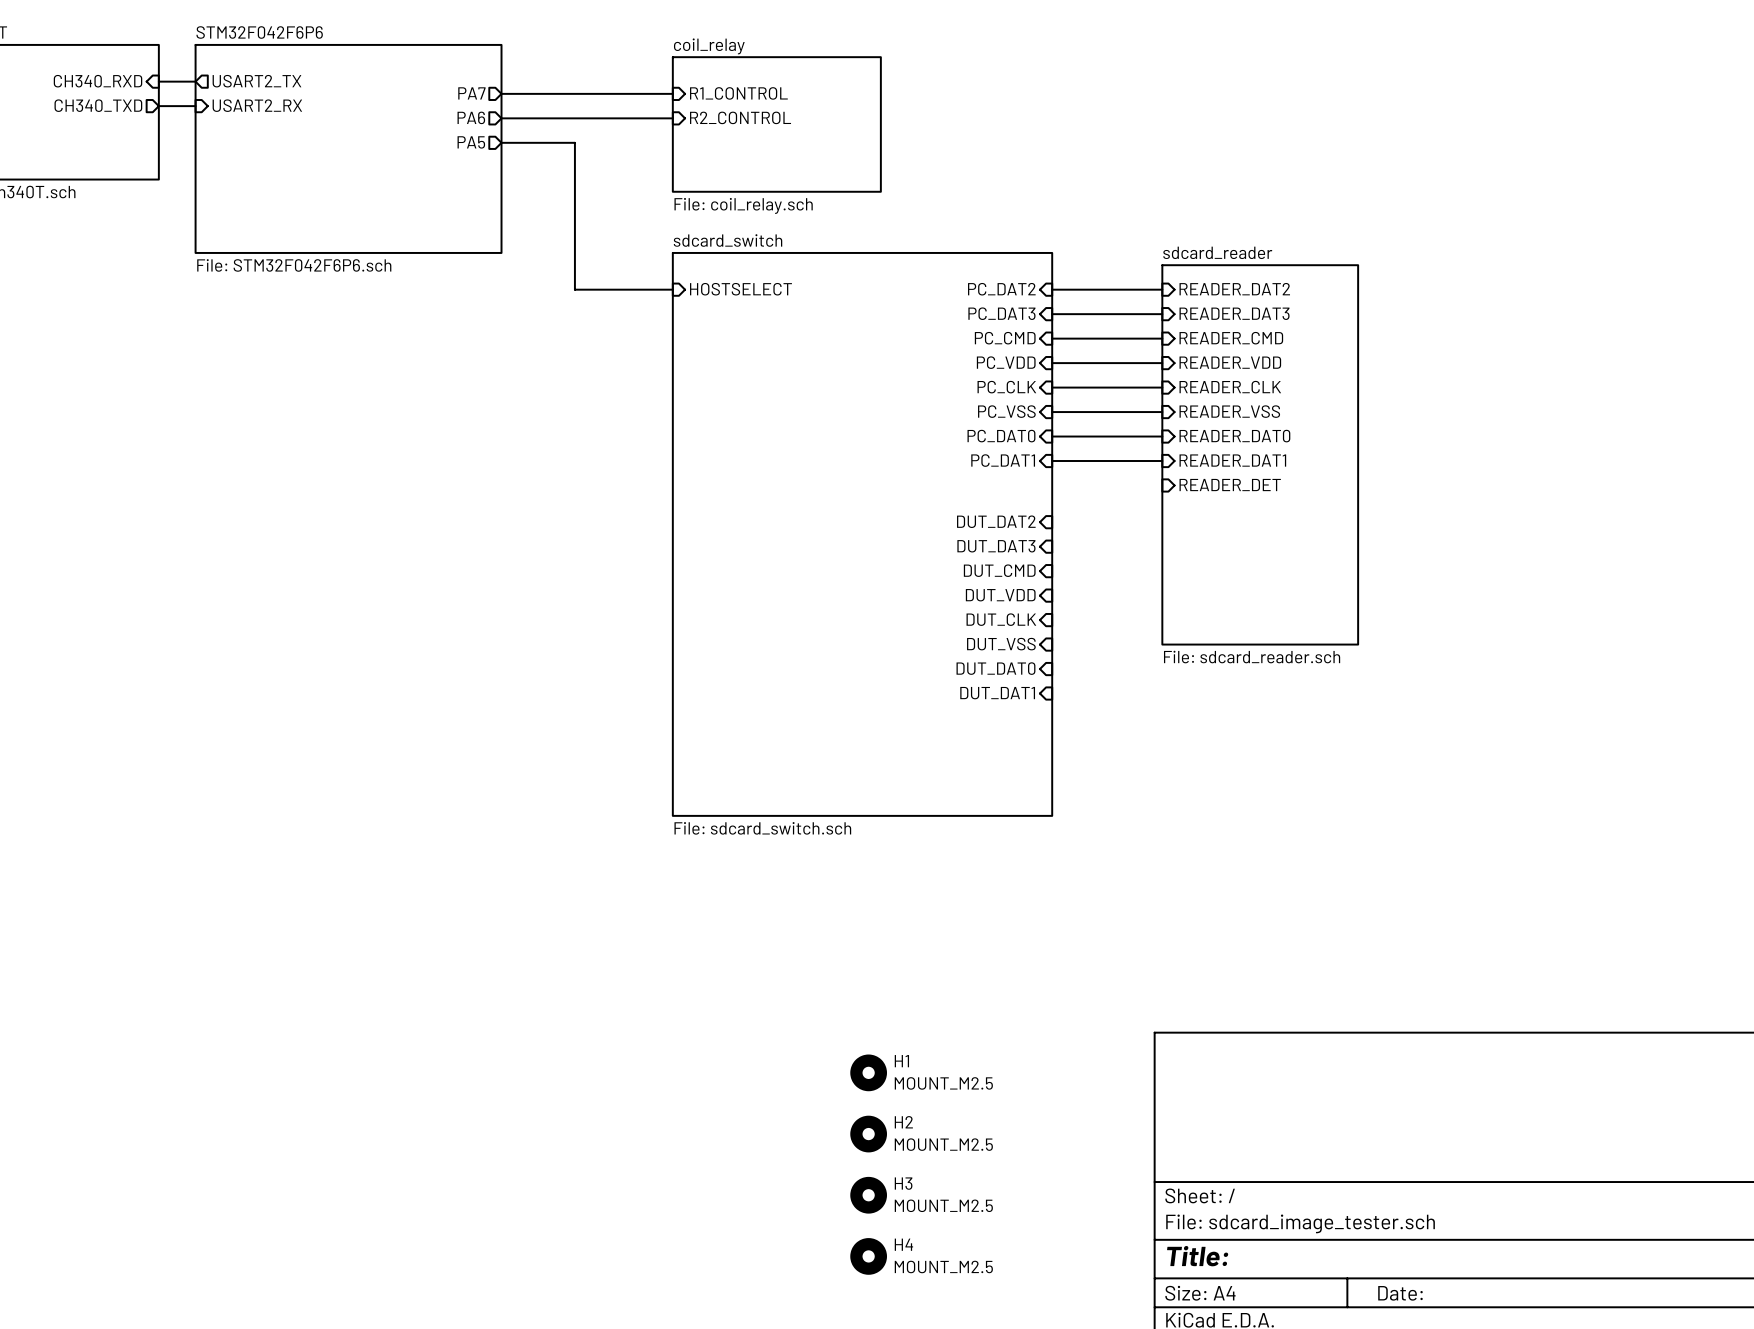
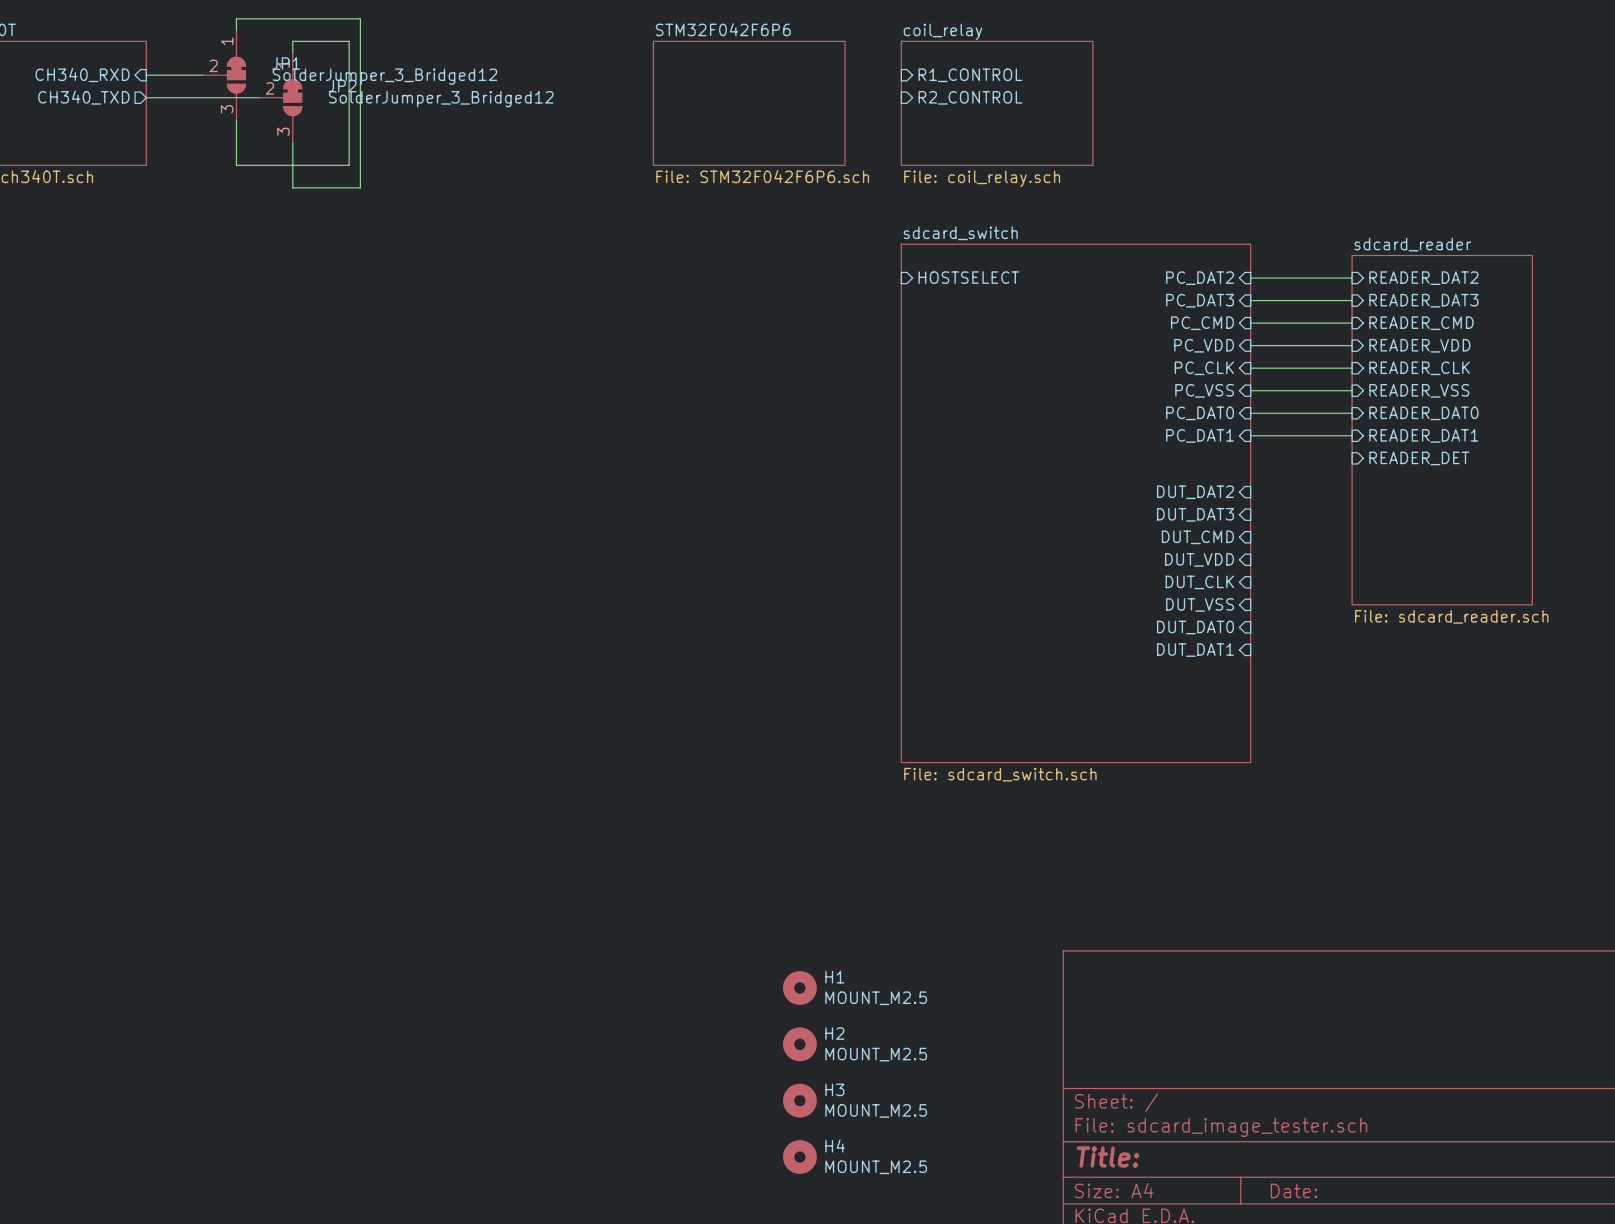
wire: none -> (236, 30) (236, 18) (360, 18) (360, 187) (292, 187) (292, 142)
sheet STM32F042F6P6 name position: STM32F042F6P6 (259, 32) -> STM32F042F6P6 (723, 29)
sheet STM32F042F6P6 shape: [195, 44, 502, 253] -> [653, 41, 845, 166]
wire: none -> (292, 52) (292, 41) (349, 41) (349, 165) (236, 165) (236, 120)
wire: none -> (180, 75) (202, 75)
JP1: none -> SolderJumper_3_Bridged12 (224, 75)
sheet pin: USART2_TX (256, 81) -> none
sheet pin: none -> R1_CONTROL (970, 75)
sheet pin: PA7 (471, 93) -> none
wire: (501, 93) (672, 93) -> none
sheet pin: R1_CONTROL (738, 93) -> none
sheet pin: USART2_RX (257, 105) -> none
sheet pin: none -> R2_CONTROL (970, 97)
wire: none -> (180, 97) (258, 97)
JP2: none -> SolderJumper_3_Bridged12 (280, 97)
sheet coil_relay: none -> File: coil_relay.sch (997, 103)
sheet pin: PA6 (471, 117) -> none
sheet pin: R2_CONTROL (740, 117) -> none
wire: (501, 118) (672, 118) -> none
sheet coil_relay: File: coil_relay.sch (776, 124) -> none
sheet pin: PA5 (471, 142) -> none
wire: (501, 142) (574, 142) (574, 289) (672, 289) -> none
sheet STM32F042F6P6 value position: File: STM32F042F6P6.sch (294, 265) -> File: STM32F042F6P6.sch (762, 176)
sheet pin: HOSTSELECT (740, 289) -> none
sheet pin: PC_DAT2 (1001, 289) -> none
wire: (1052, 289) (1162, 289) -> none
sheet pin: READER_DAT2 (1234, 289) -> none
sheet pin: none -> HOSTSELECT (968, 277)
sheet pin: none -> PC_DAT2 (1200, 278)
wire: none -> (1250, 278) (1352, 278)
sheet pin: none -> READER_DAT2 (1423, 278)
sheet pin: PC_DAT3 (1001, 313) -> none
sheet pin: READER_DAT3 (1234, 313) -> none
wire: (1052, 314) (1162, 314) -> none
sheet pin: none -> PC_DAT3 (1200, 300)
wire: none -> (1250, 300) (1352, 300)
sheet pin: none -> READER_DAT3 (1423, 300)
sheet pin: PC_CMD (1005, 338) -> none
wire: (1052, 338) (1162, 338) -> none
sheet pin: READER_CMD (1231, 338) -> none
sheet pin: none -> PC_CMD (1202, 323)
wire: none -> (1250, 323) (1352, 323)
sheet pin: none -> READER_CMD (1421, 323)
sheet pin: PC_VDD (1006, 362) -> none
sheet pin: READER_VDD (1230, 362) -> none
wire: (1052, 363) (1162, 363) -> none
sheet pin: none -> PC_VDD (1204, 345)
sheet pin: none -> READER_VDD (1419, 345)
wire: none -> (1250, 345) (1352, 345)
sheet pin: PC_CLK (1006, 387) -> none
wire: (1052, 387) (1162, 387) -> none
sheet pin: READER_CLK (1230, 387) -> none
sheet pin: none -> PC_CLK (1204, 368)
wire: none -> (1250, 368) (1352, 368)
sheet pin: none -> READER_CLK (1419, 368)
sheet pin: PC_VSS (1006, 411) -> none
sheet pin: READER_VSS (1229, 411) -> none
wire: (1052, 412) (1162, 412) -> none
sheet pin: none -> PC_VSS (1204, 390)
sheet pin: none -> READER_VSS (1419, 390)
wire: none -> (1250, 390) (1352, 390)
sheet pin: PC_DAT0 (1001, 436) -> none
wire: (1052, 436) (1162, 436) -> none
sheet pin: READER_DAT0 (1234, 436) -> none
sheet pin: none -> PC_DAT0 (1200, 413)
wire: none -> (1250, 413) (1352, 413)
sheet pin: none -> READER_DAT0 (1423, 413)
sheet sdcard_reader: File: sdcard_reader.sch (1260, 454) -> none
sheet pin: PC_DAT1 (1003, 460) -> none
sheet pin: READER_DAT1 (1232, 460) -> none
wire: (1052, 461) (1162, 461) -> none
sheet sdcard_reader: none -> File: sdcard_reader.sch (1442, 430)
sheet pin: none -> PC_DAT1 (1200, 435)
sheet pin: none -> READER_DAT1 (1423, 435)
wire: none -> (1250, 435) (1352, 435)
sheet pin: READER_DET (1230, 485) -> none
sheet pin: none -> READER_DET (1419, 458)
sheet pin: DUT_DAT2 (996, 521) -> none
sheet pin: none -> DUT_DAT2 (1195, 492)
sheet sdcard_switch: File: sdcard_switch.sch (862, 534) -> none
sheet pin: DUT_DAT3 (996, 546) -> none
sheet sdcard_switch: none -> File: sdcard_switch.sch (1076, 503)
sheet pin: none -> DUT_DAT3 (1195, 514)
sheet pin: DUT_CMD (999, 570) -> none
sheet pin: none -> DUT_CMD (1197, 537)
sheet pin: DUT_VDD (1000, 595) -> none
sheet pin: none -> DUT_VDD (1199, 559)
sheet pin: DUT_CLK (1001, 619) -> none
sheet pin: none -> DUT_CLK (1199, 582)
sheet pin: DUT_VSS (1001, 644) -> none
sheet pin: none -> DUT_VSS (1200, 604)
sheet pin: DUT_DAT0 (995, 668) -> none
sheet pin: none -> DUT_DAT0 (1195, 627)
sheet pin: DUT_DAT1 (997, 693) -> none
sheet pin: none -> DUT_DAT1 (1195, 650)

